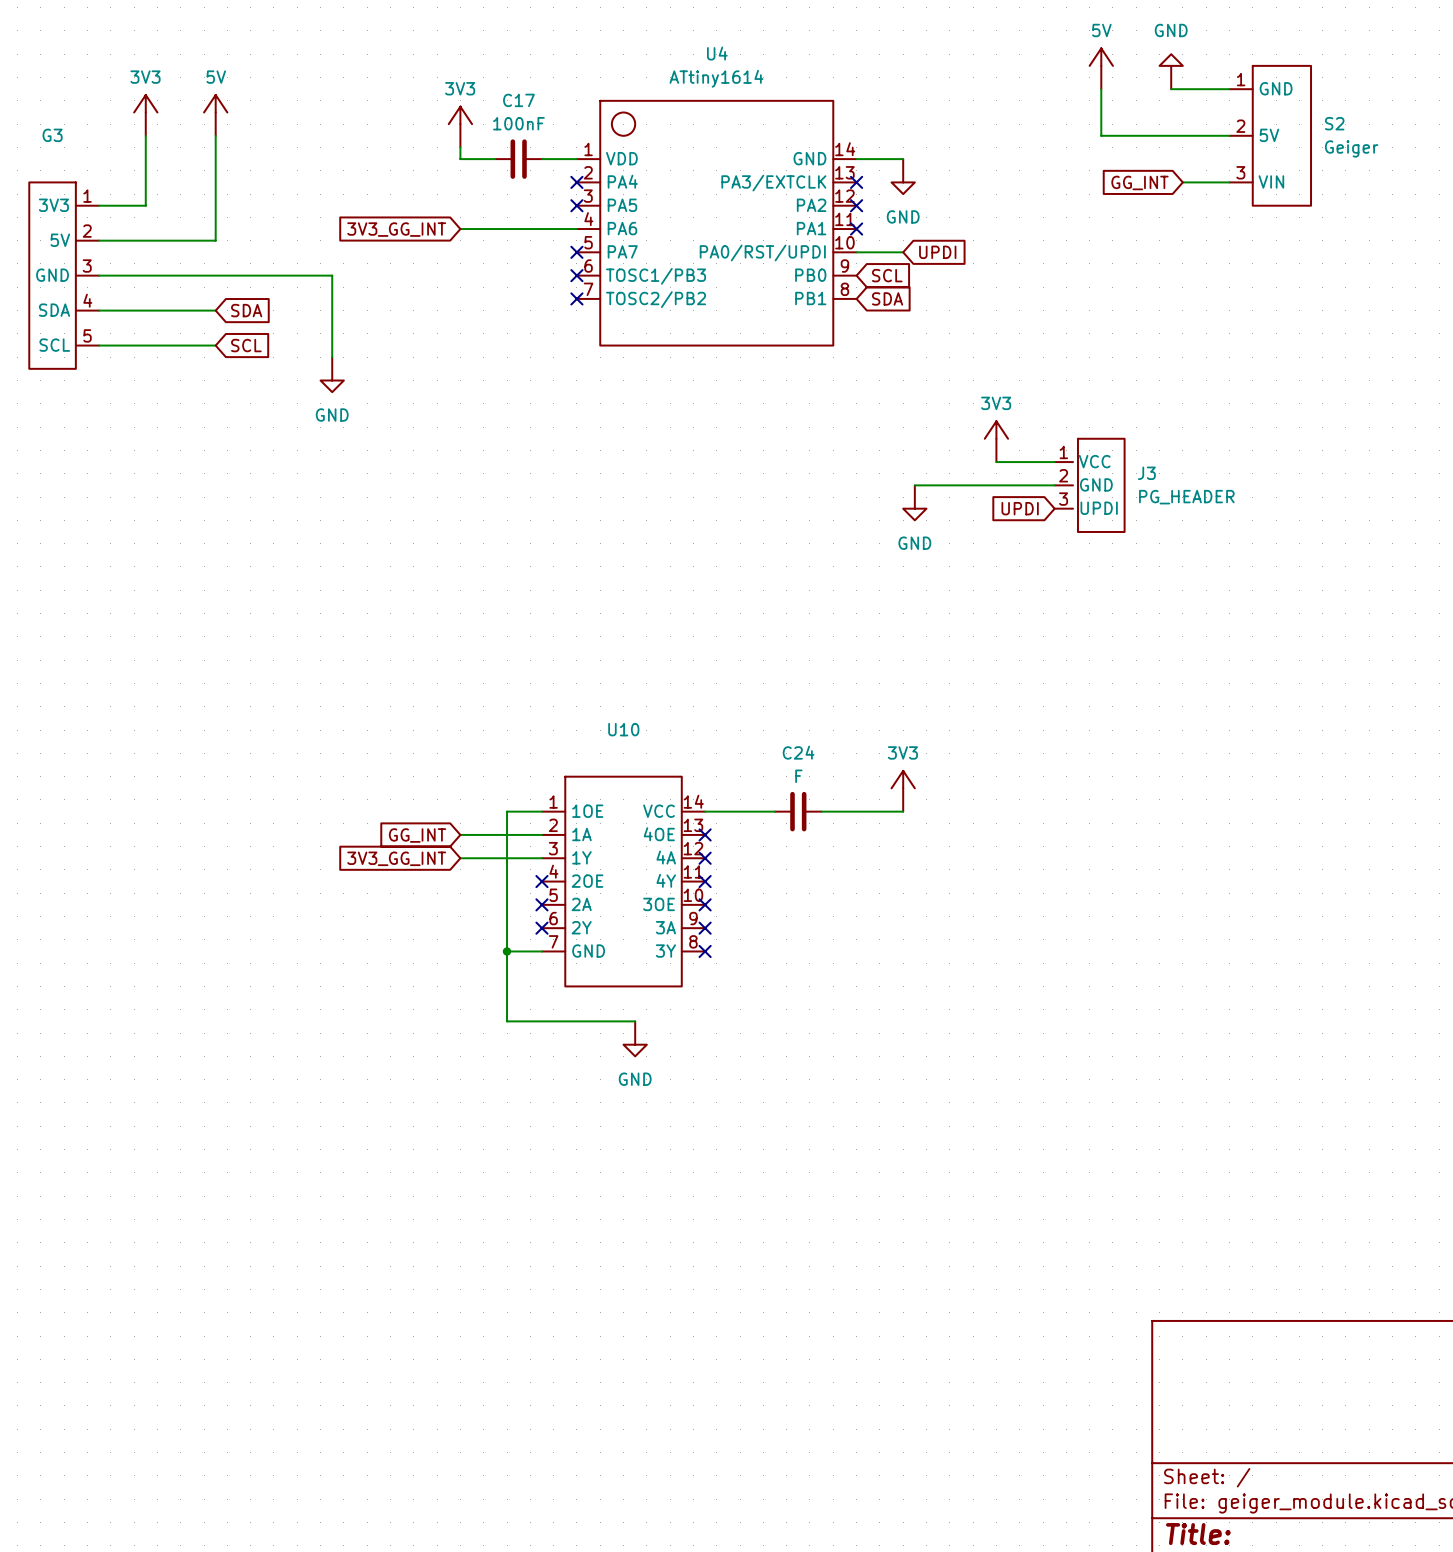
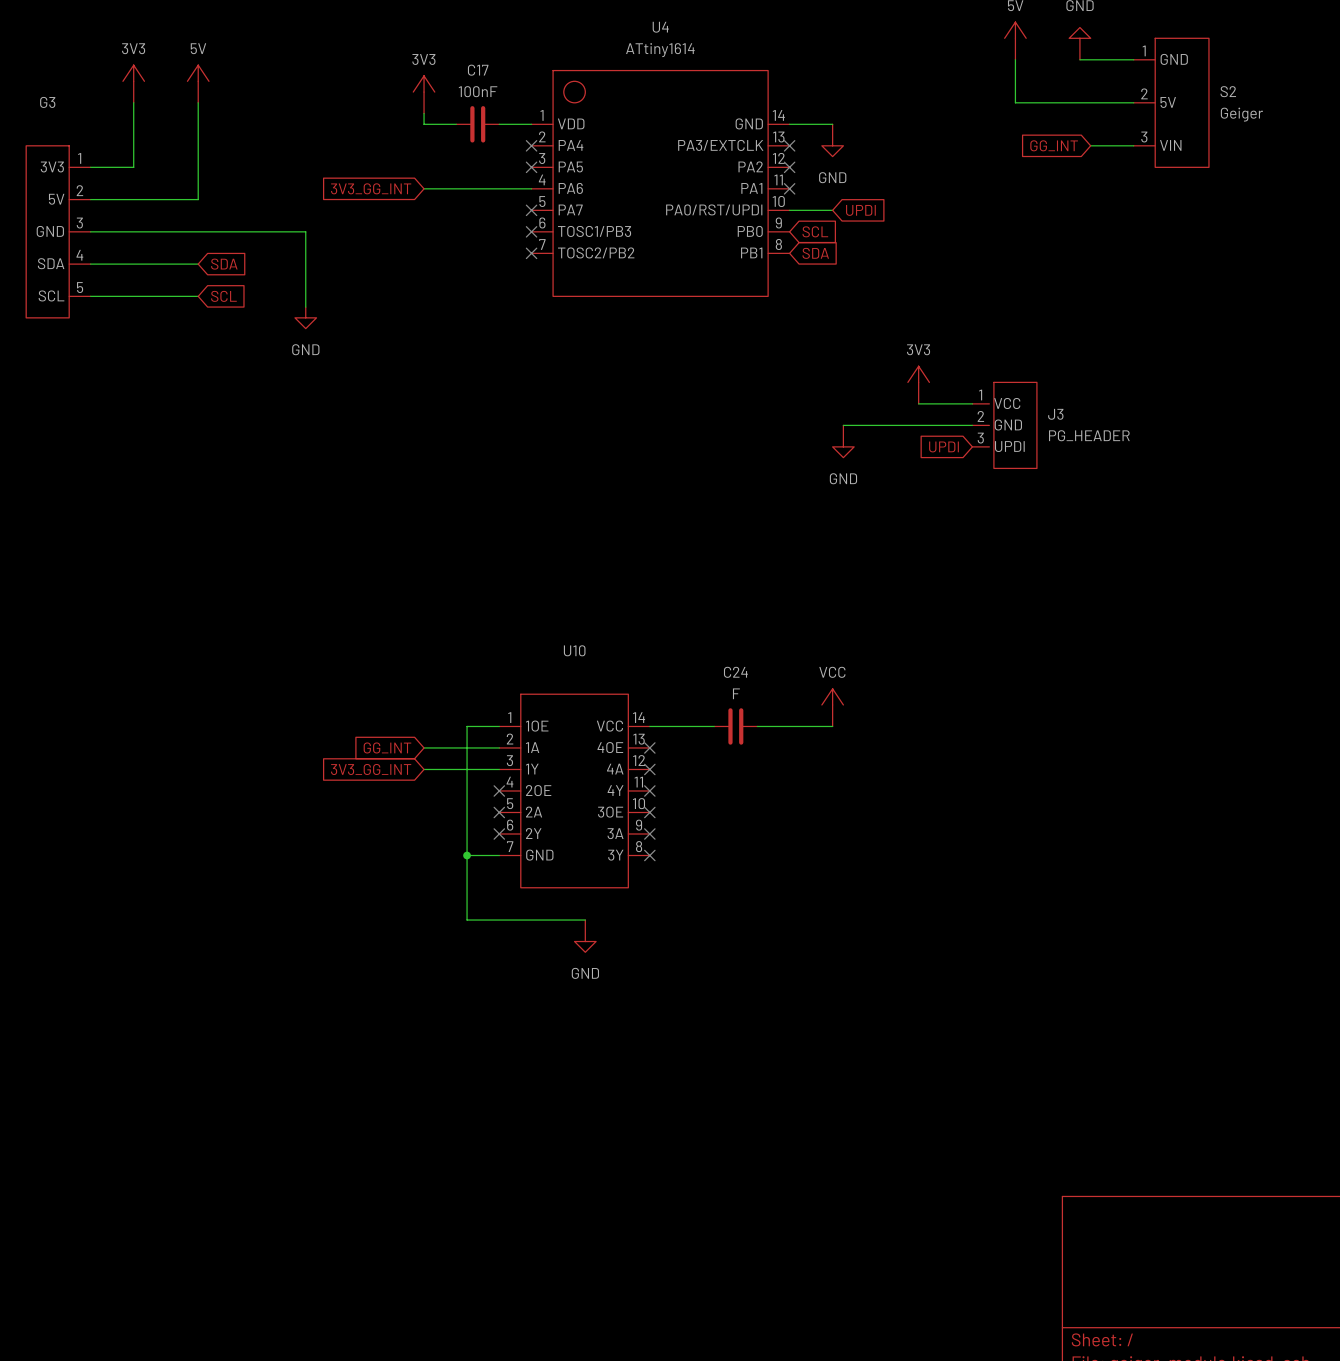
power symbol shape: [320, 357, 344, 393] -> [294, 307, 317, 329]
power symbol: 3V3 (903, 791) -> VCC (832, 707)

